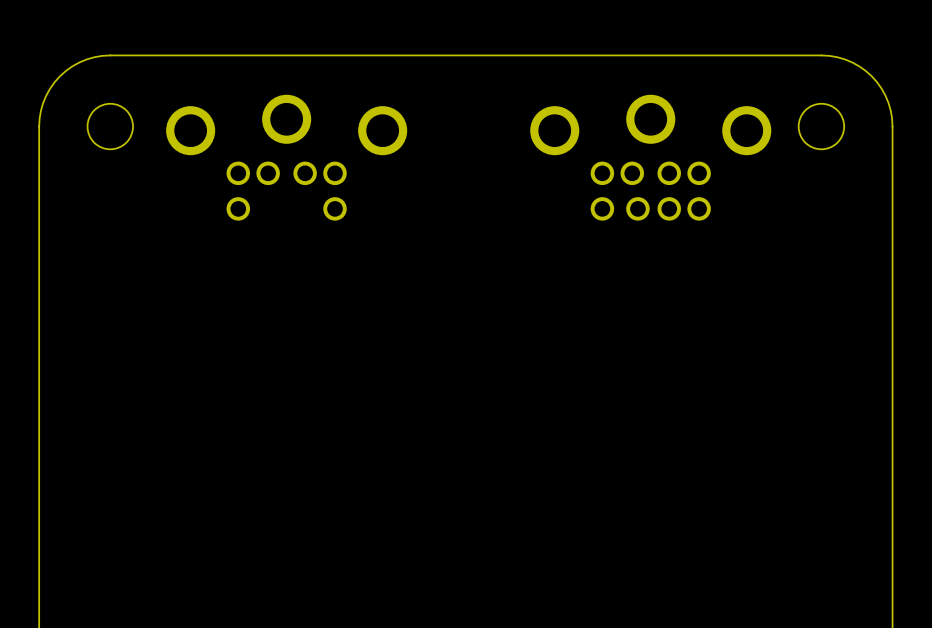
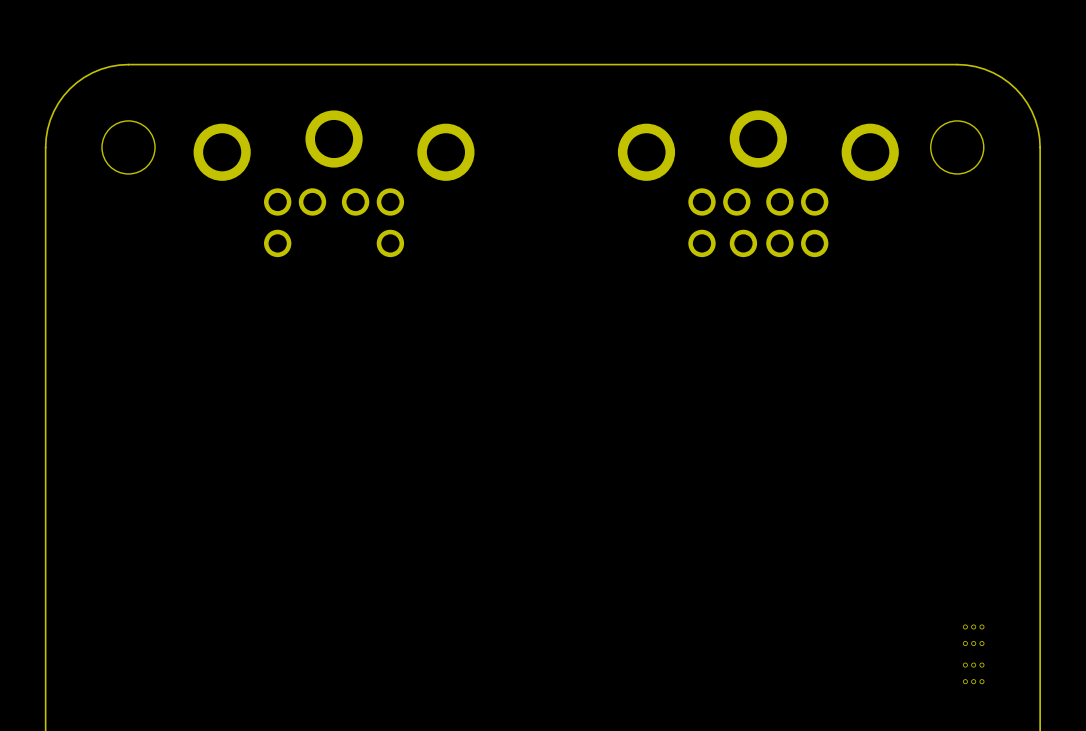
part: none -> (973, 654)

